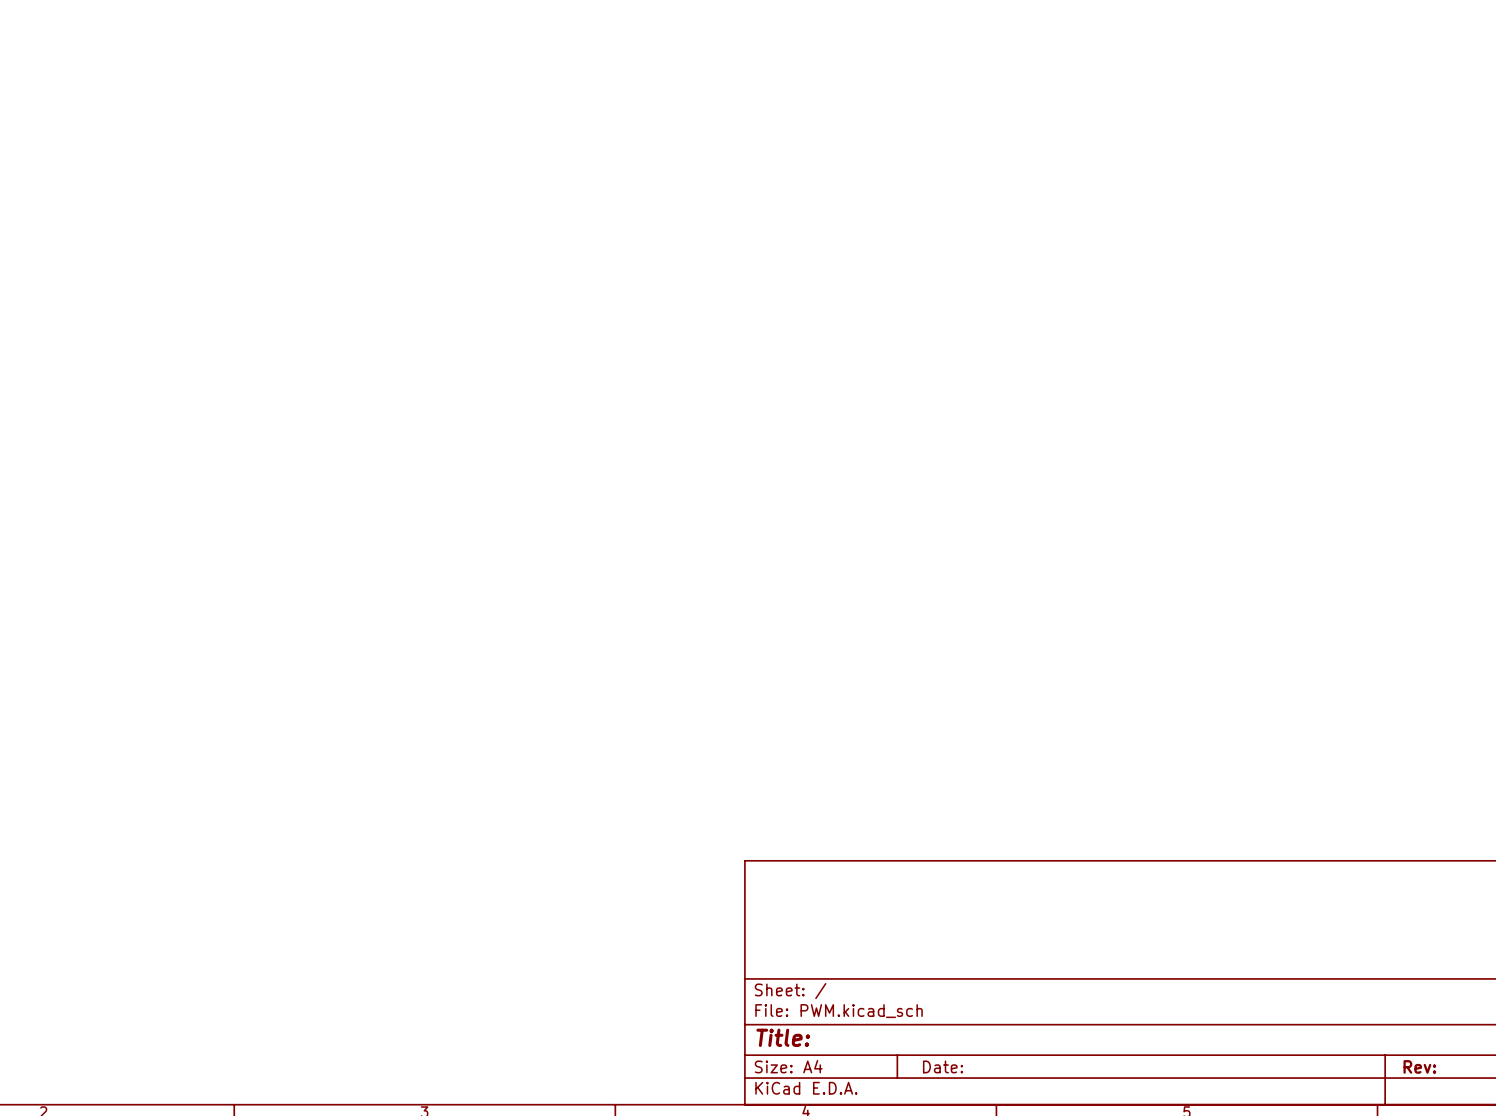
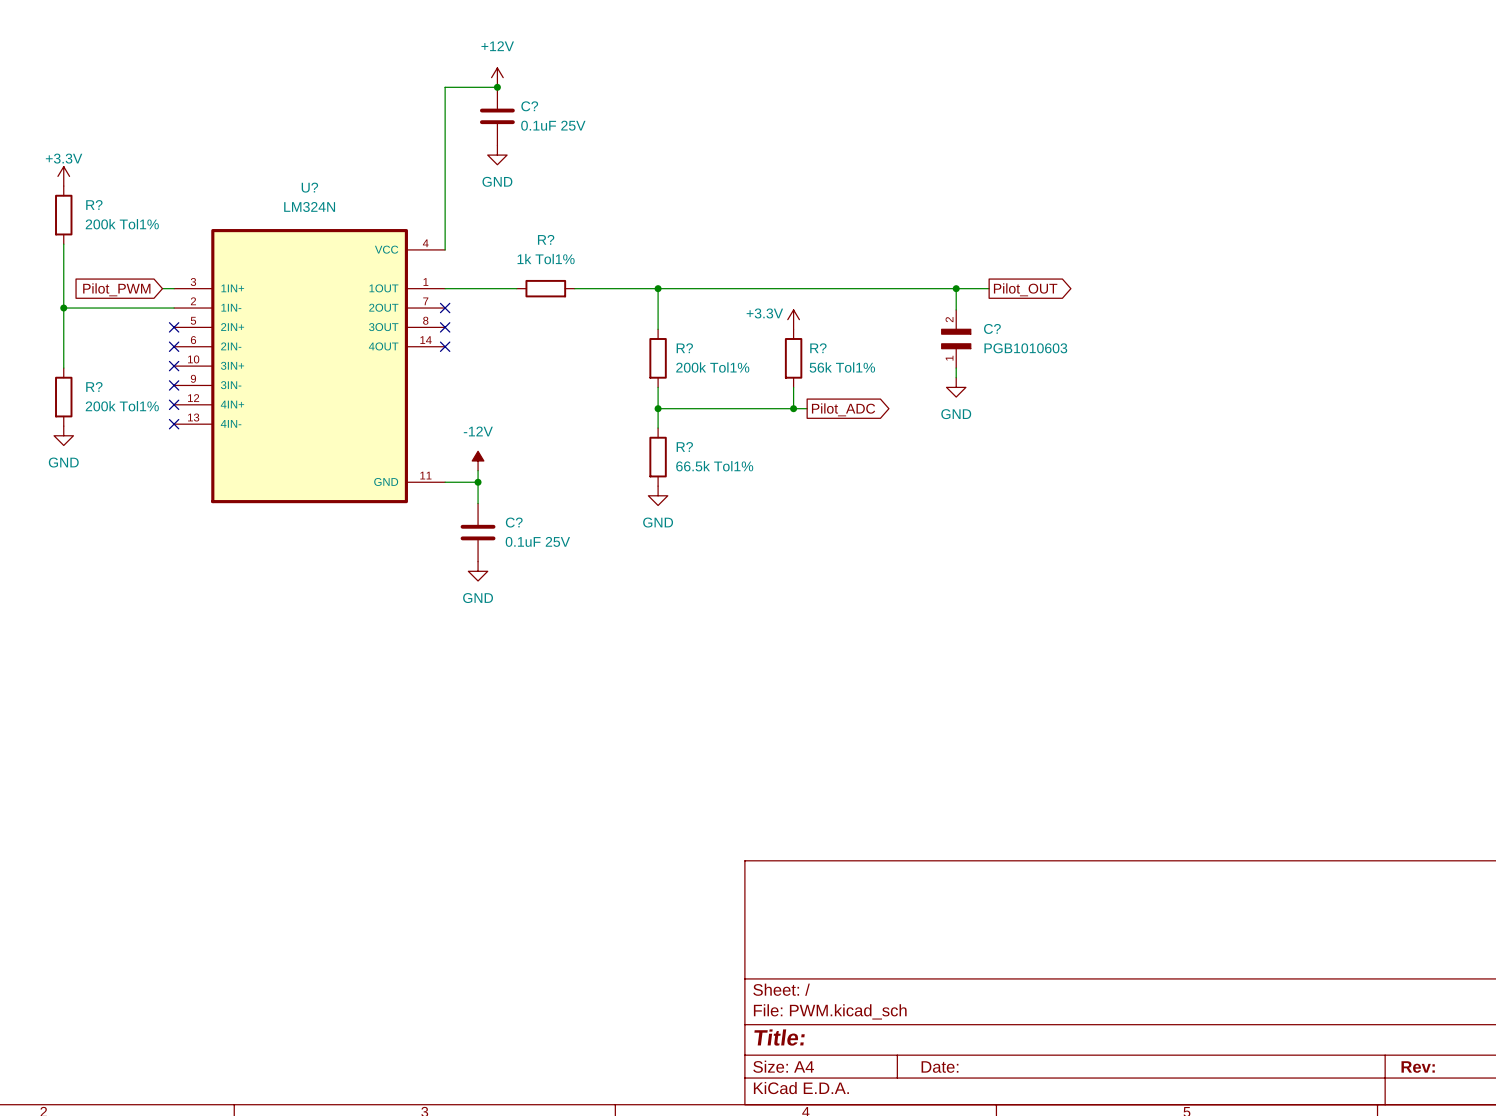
power symbol: none -> +12V (497, 77)
wire: none -> (497, 87) (445, 87) (445, 249)
junction: none -> (497, 87)
C?: none -> 0.1uF 25V (497, 116)
power symbol: none -> GND (497, 155)
power symbol: none -> +3.3V (63, 176)
R?: none -> 200k Tol1% (63, 215)
wire: none -> (63, 244) (63, 368)
wire: none -> (162, 288) (174, 288)
wire: none -> (445, 288) (516, 288)
R?: none -> 1k Tol1% (545, 288)
wire: none -> (574, 288) (989, 288)
wire: none -> (658, 288) (658, 329)
junction: none -> (658, 288)
wire: none -> (956, 288) (956, 309)
junction: none -> (956, 288)
global label: none -> Pilot_PWM (116, 289)
global label: none -> Pilot_OUT (1025, 289)
wire: none -> (63, 308) (174, 308)
junction: none -> (63, 308)
no-connect mark: none -> (445, 308)
power symbol: none -> +3.3V (793, 319)
no-connect mark: none -> (174, 327)
no-connect mark: none -> (445, 327)
C?: none -> PGB1010603 (956, 338)
no-connect mark: none -> (174, 346)
no-connect mark: none -> (445, 346)
R?: none -> 200k Tol1% (658, 358)
R?: none -> 56k Tol1% (793, 358)
no-connect mark: none -> (174, 366)
U?: none -> LM324N (309, 366)
wire: none -> (956, 368) (956, 377)
no-connect mark: none -> (174, 385)
wire: none -> (658, 387) (658, 428)
wire: none -> (793, 387) (793, 408)
power symbol: none -> GND (956, 387)
R?: none -> 200k Tol1% (63, 397)
no-connect mark: none -> (174, 404)
wire: none -> (658, 408) (807, 408)
junction: none -> (658, 408)
junction: none -> (793, 408)
global label: none -> Pilot_ADC (843, 409)
no-connect mark: none -> (174, 424)
power symbol: none -> GND (63, 435)
R?: none -> 66.5k Tol1% (658, 457)
power symbol: none -> -12V (478, 460)
wire: none -> (478, 470) (478, 503)
wire: none -> (445, 482) (478, 482)
junction: none -> (478, 482)
power symbol: none -> GND (658, 495)
C?: none -> 0.1uF 25V (478, 532)
power symbol: none -> GND (478, 571)

